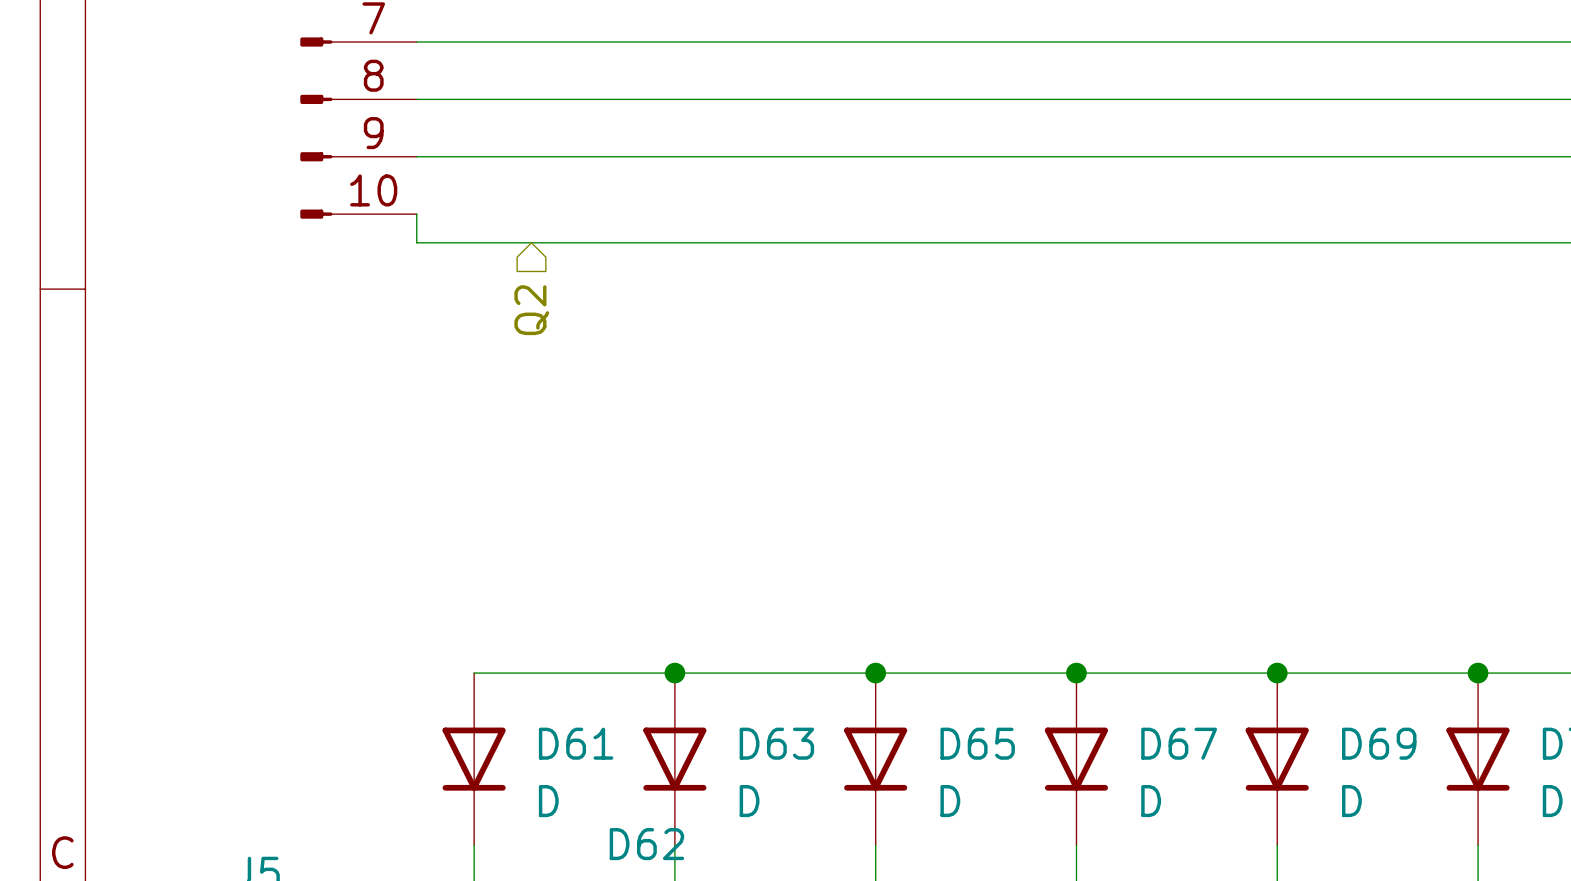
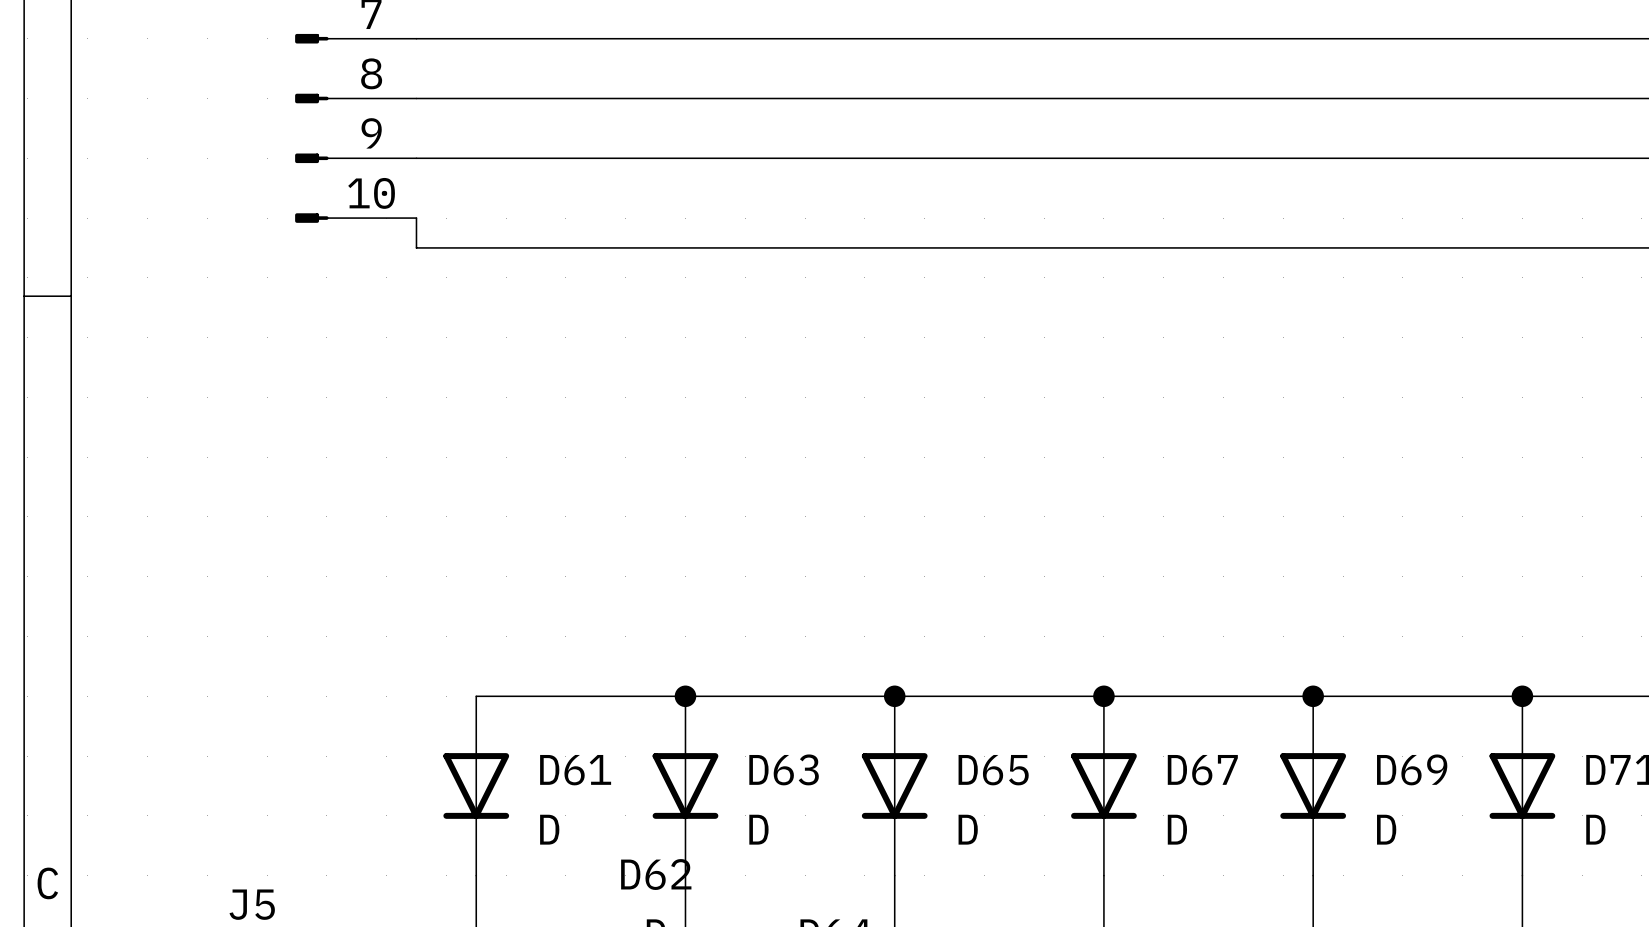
hierarchical label: Q2 (531, 310) -> none

